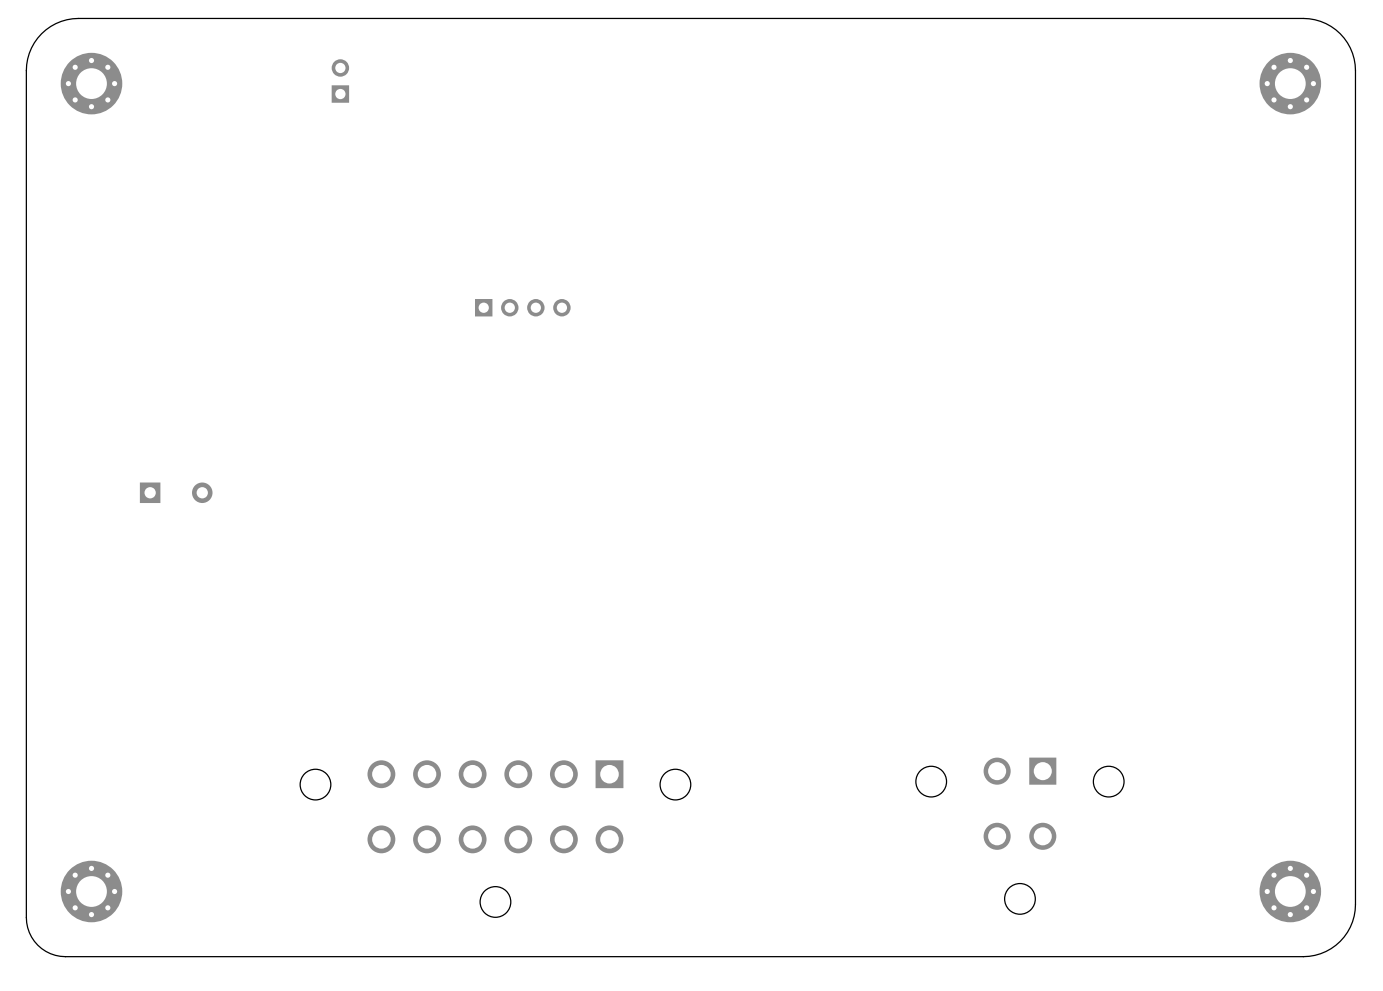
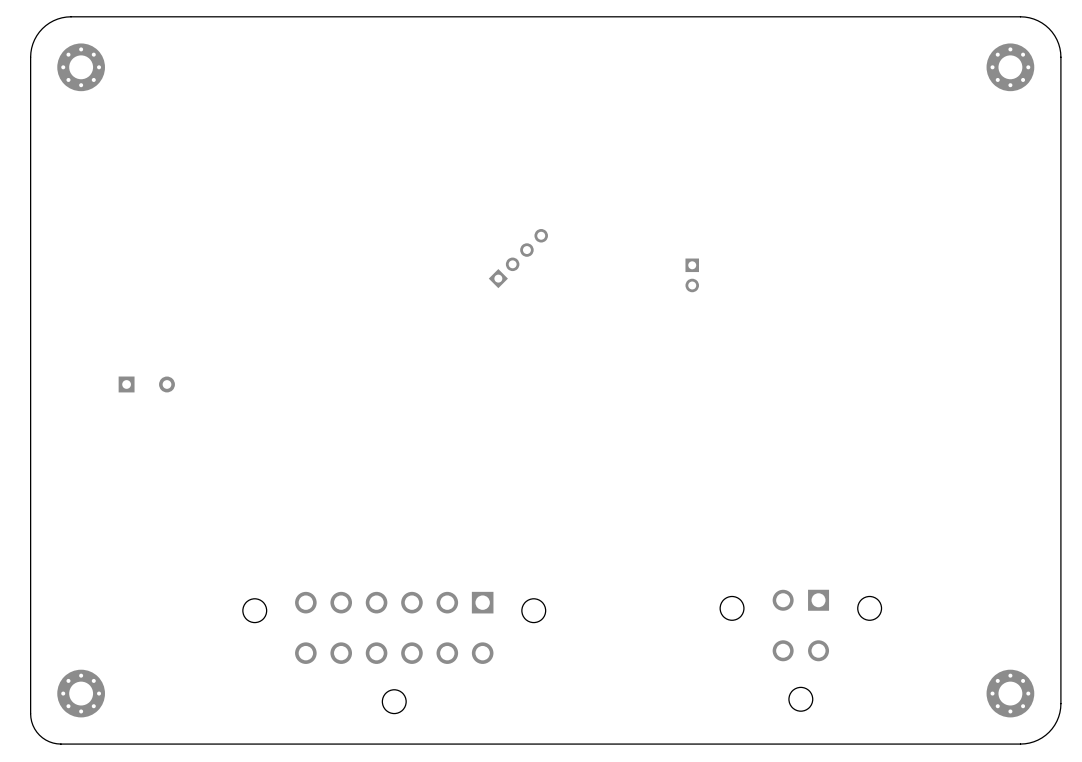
part: (340, 81) -> none
part: (522, 307) -> none
part: none -> (518, 258)
part: none -> (692, 275)

